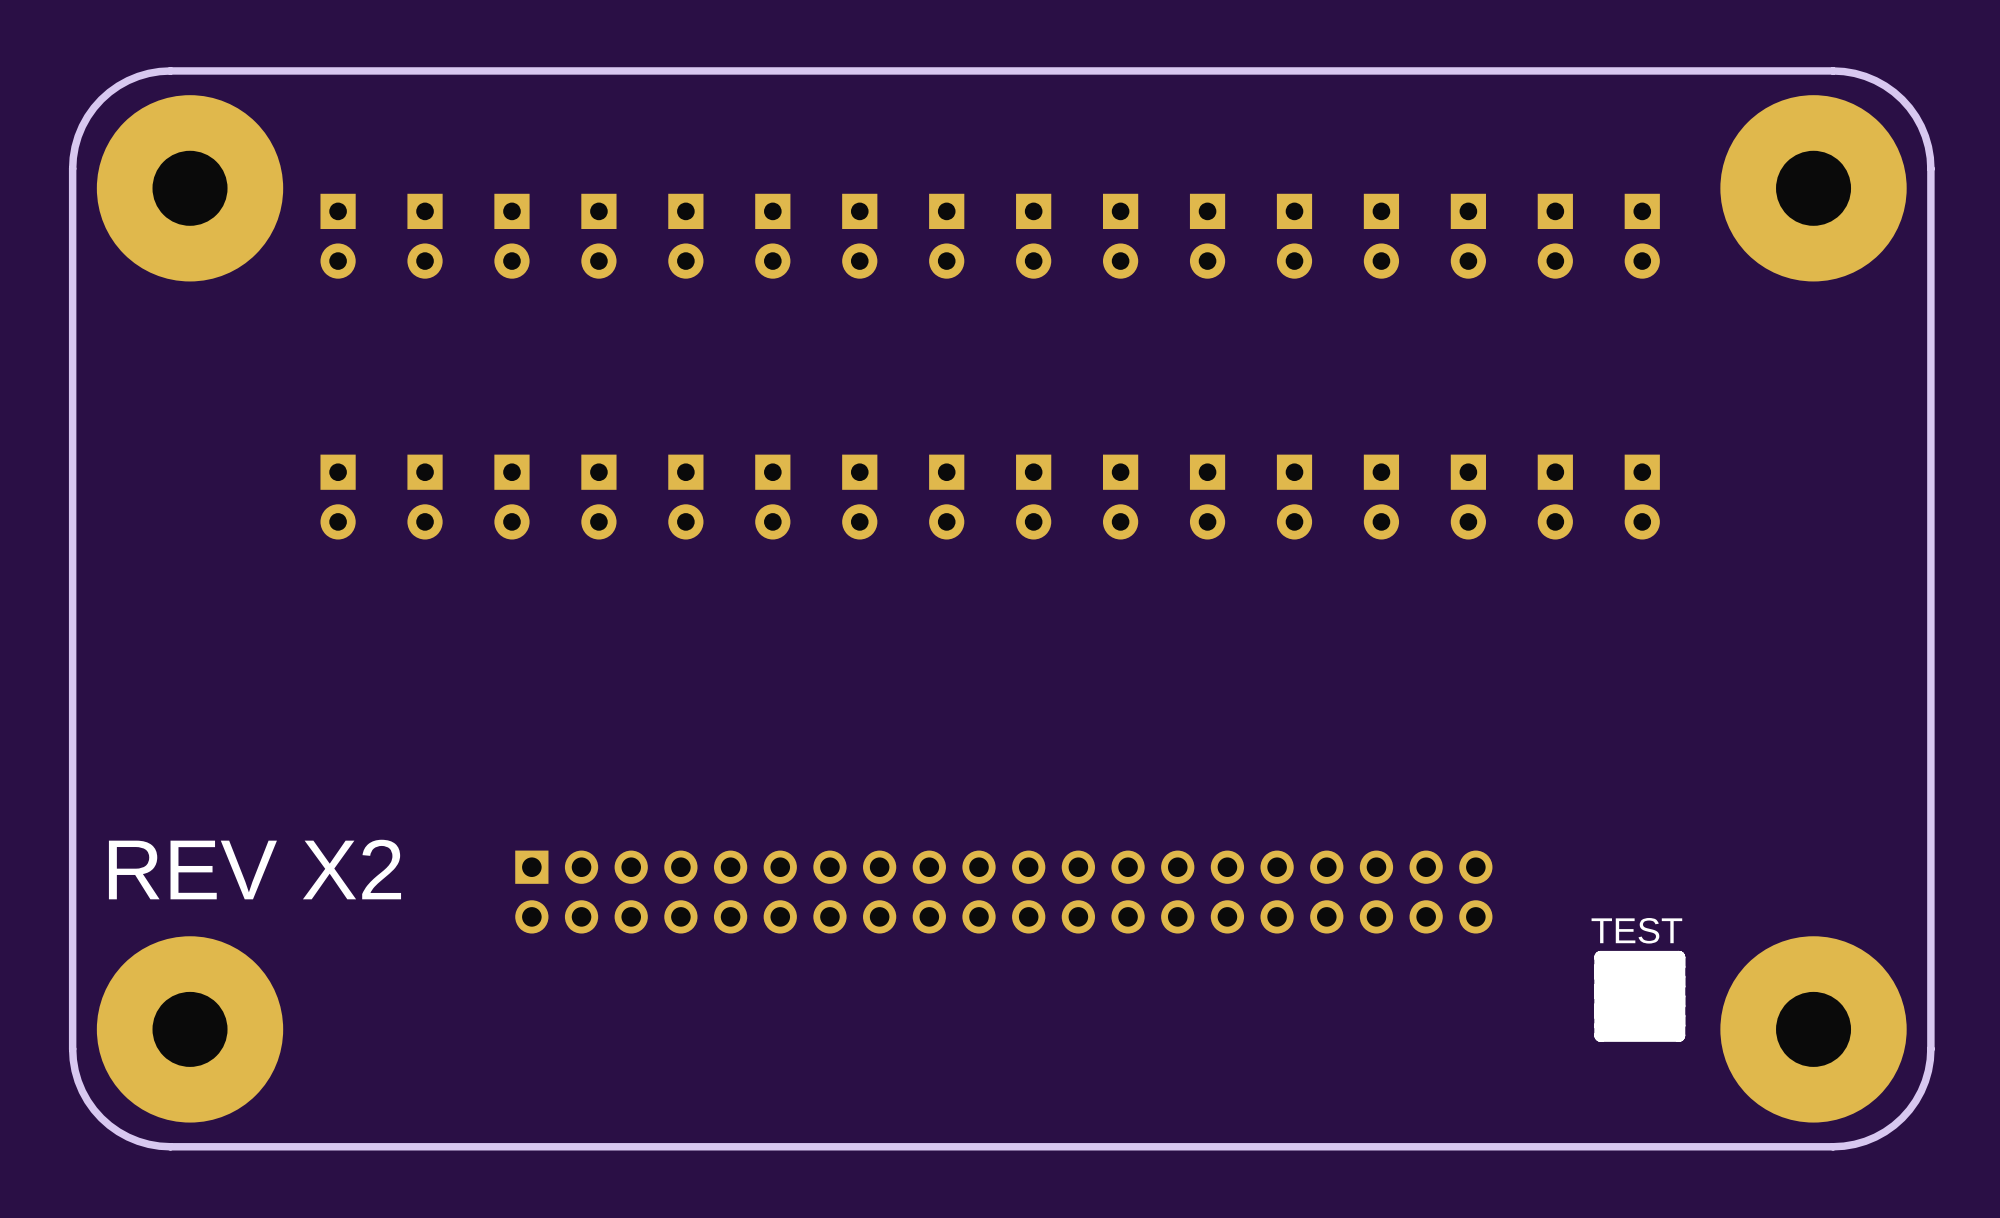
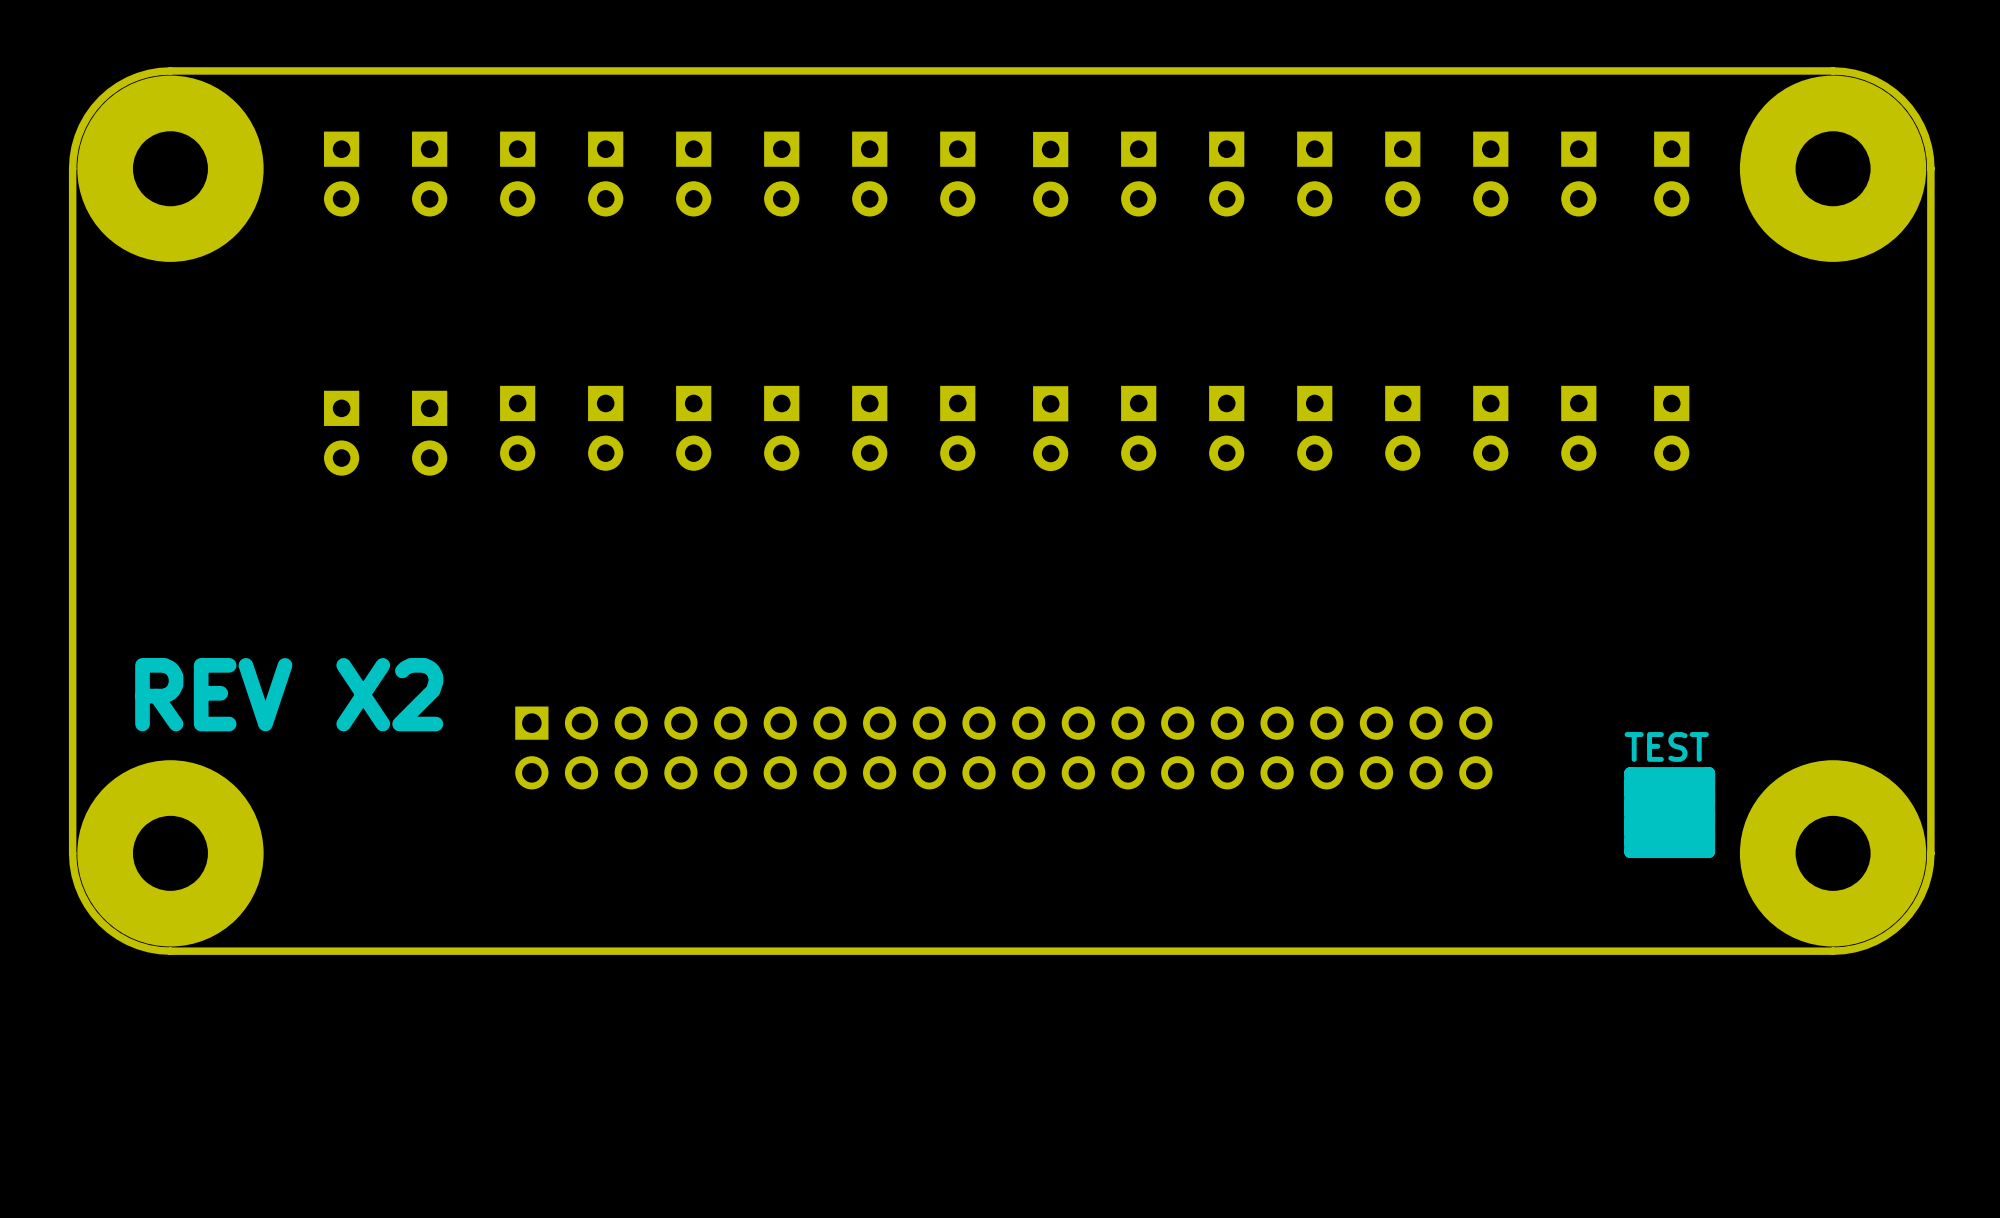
part: none -> (341, 174)
part: none -> (429, 174)
part: none -> (517, 174)
part: none -> (605, 174)
part: none -> (693, 174)
part: none -> (781, 174)
part: none -> (869, 174)
part: none -> (957, 174)
part: none -> (1050, 174)
part: none -> (1138, 174)
part: none -> (1226, 174)
part: none -> (1314, 174)
part: none -> (1402, 174)
part: none -> (1490, 174)
part: none -> (1578, 174)
part: none -> (1671, 174)
part position: (190, 188) -> (170, 168)
part position: (1813, 188) -> (1833, 168)
part: (338, 236) -> none
part: (425, 236) -> none
part: (511, 236) -> none
part: (598, 236) -> none
part: (685, 236) -> none
part: (772, 236) -> none
part: (859, 236) -> none
part: (946, 236) -> none
part: (1033, 236) -> none
part: (1120, 236) -> none
part: (1207, 236) -> none
part: (1294, 236) -> none
part: (1381, 236) -> none
part: (1468, 236) -> none
part: (1555, 236) -> none
part: (1642, 236) -> none
part: none -> (517, 428)
part: none -> (605, 428)
part: none -> (693, 428)
part: none -> (781, 428)
part: none -> (869, 428)
part: none -> (957, 428)
part: none -> (1050, 428)
part: none -> (1138, 428)
part: none -> (1226, 428)
part: none -> (1314, 428)
part: none -> (1402, 428)
part: none -> (1490, 428)
part: none -> (1578, 428)
part: none -> (1671, 428)
part: none -> (341, 433)
part: none -> (429, 433)
part: (338, 497) -> none
part: (425, 497) -> none
part: (511, 497) -> none
part: (598, 497) -> none
part: (685, 497) -> none
part: (772, 497) -> none
part: (859, 497) -> none
part: (946, 497) -> none
part: (1033, 497) -> none
part: (1120, 497) -> none
part: (1207, 497) -> none
part: (1294, 497) -> none
part: (1381, 497) -> none
part: (1468, 497) -> none
part: (1555, 497) -> none
part: (1642, 497) -> none
board edge: (1930, 853) (1930, 1048) (1925, 1081) (1909, 1109) (1885, 1131) (1854, 1144) (1833, 1146) (159, 1146) (138, 1141) (109, 1125) (93, 1109) (78, 1081) (72, 1048) (72, 853) -> (1930, 853) (1928, 875) (1921, 895) (1902, 922) (1885, 936) (1865, 945) (1833, 951) (170, 951) (138, 945) (118, 936) (101, 922) (87, 905) (78, 885) (72, 853)
text position: REV X2 (254, 869) -> REV X2 (289, 694)
part position: (1003, 892) -> (1003, 747)
TEST position: (1639, 996) -> (1669, 812)
part position: (190, 1029) -> (170, 853)
part position: (1813, 1029) -> (1833, 853)

